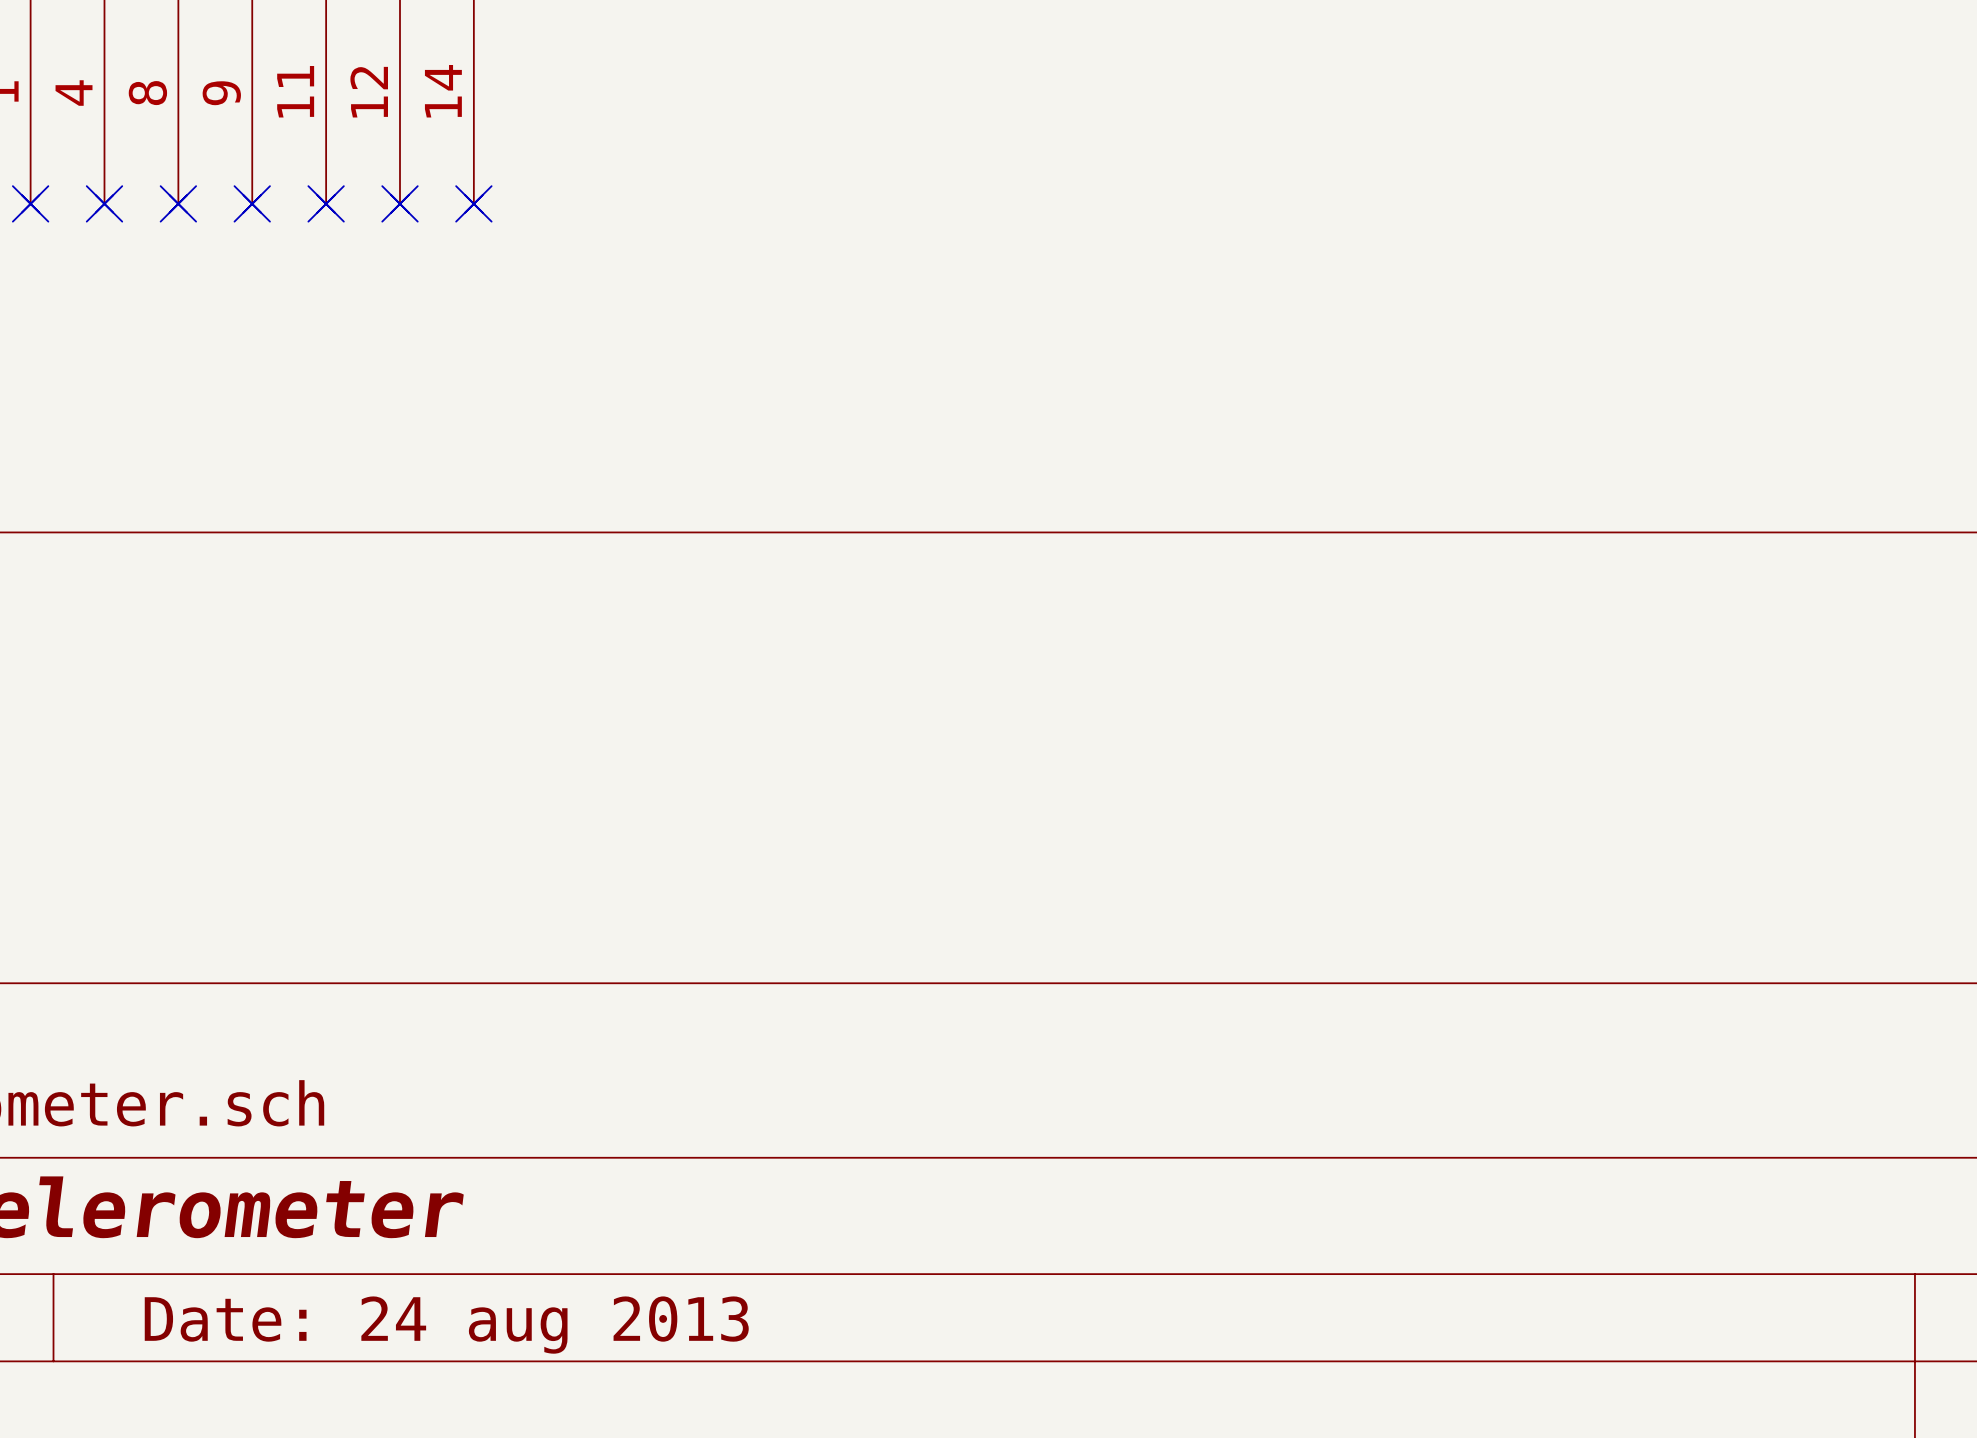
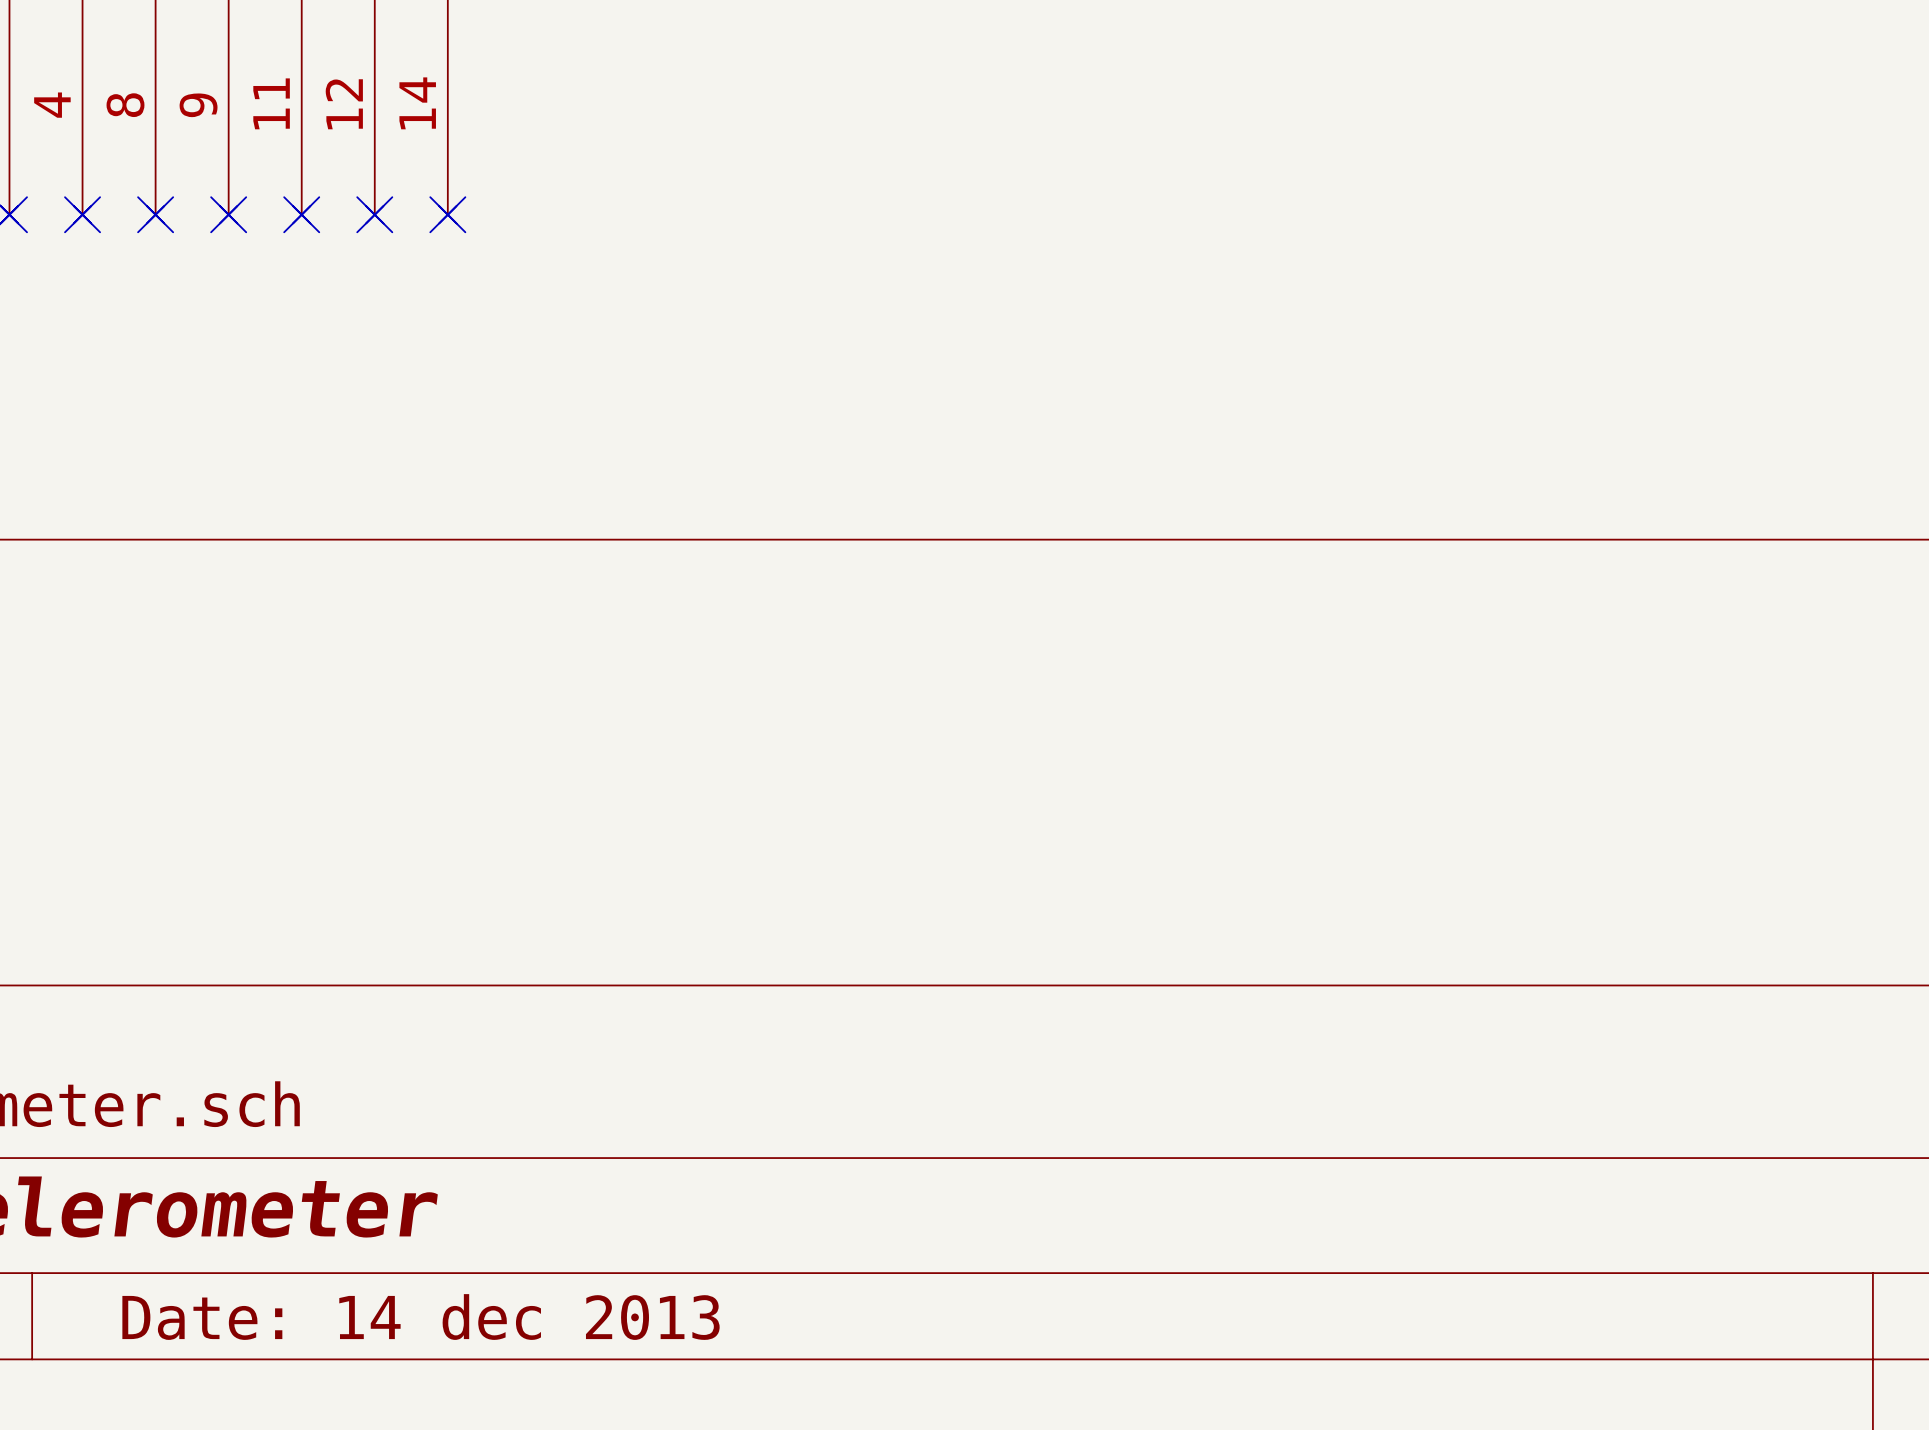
title block: Date: 24 aug 2013 (446, 1325) -> Date: 14 dec 2013 (421, 1317)

